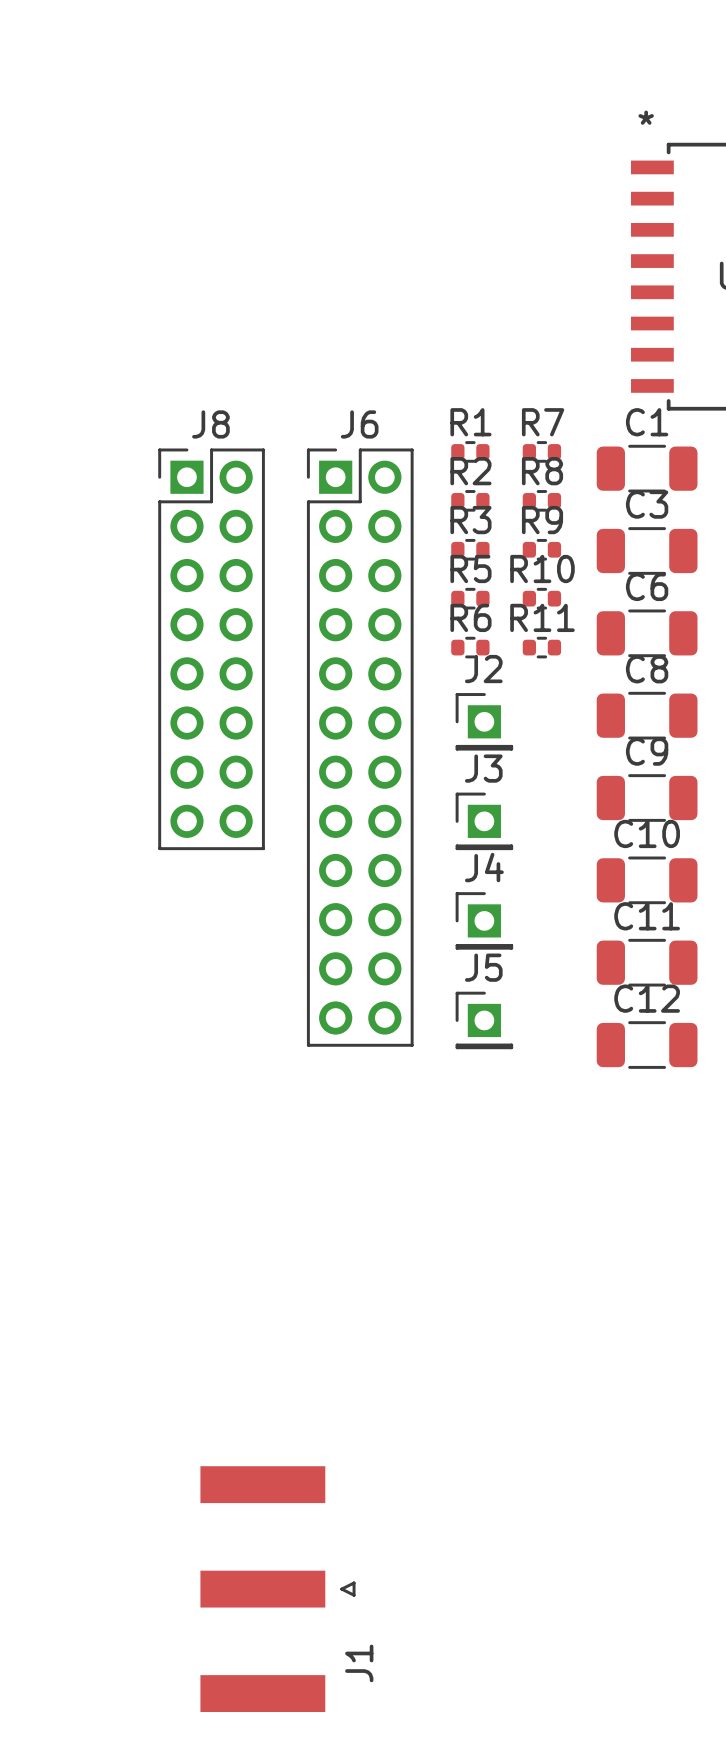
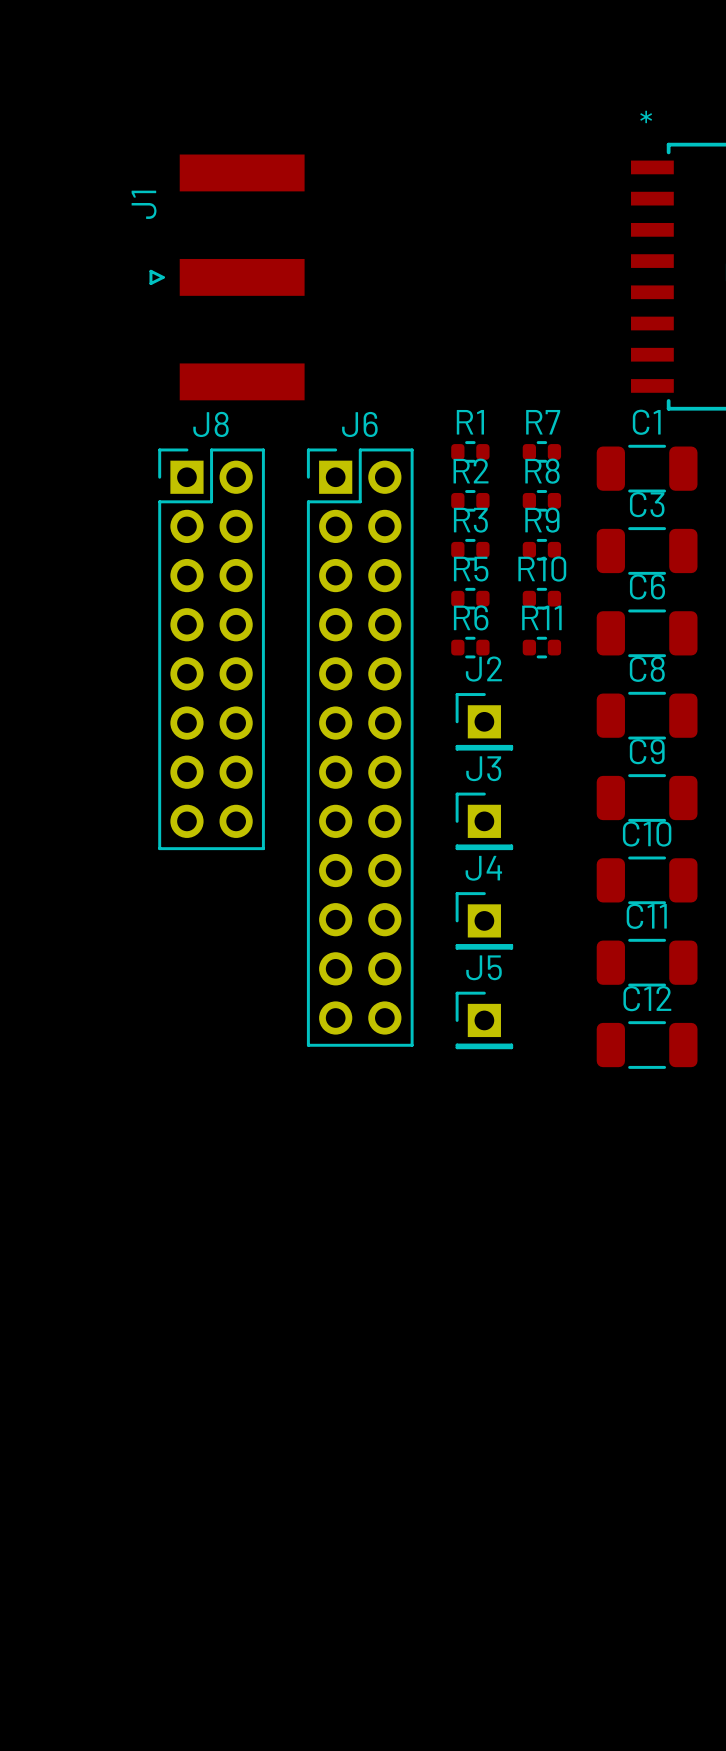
J1 rotation: 0° (277, 1589) -> 180° (227, 277)
J1 position: (277, 1589) -> (227, 277)

